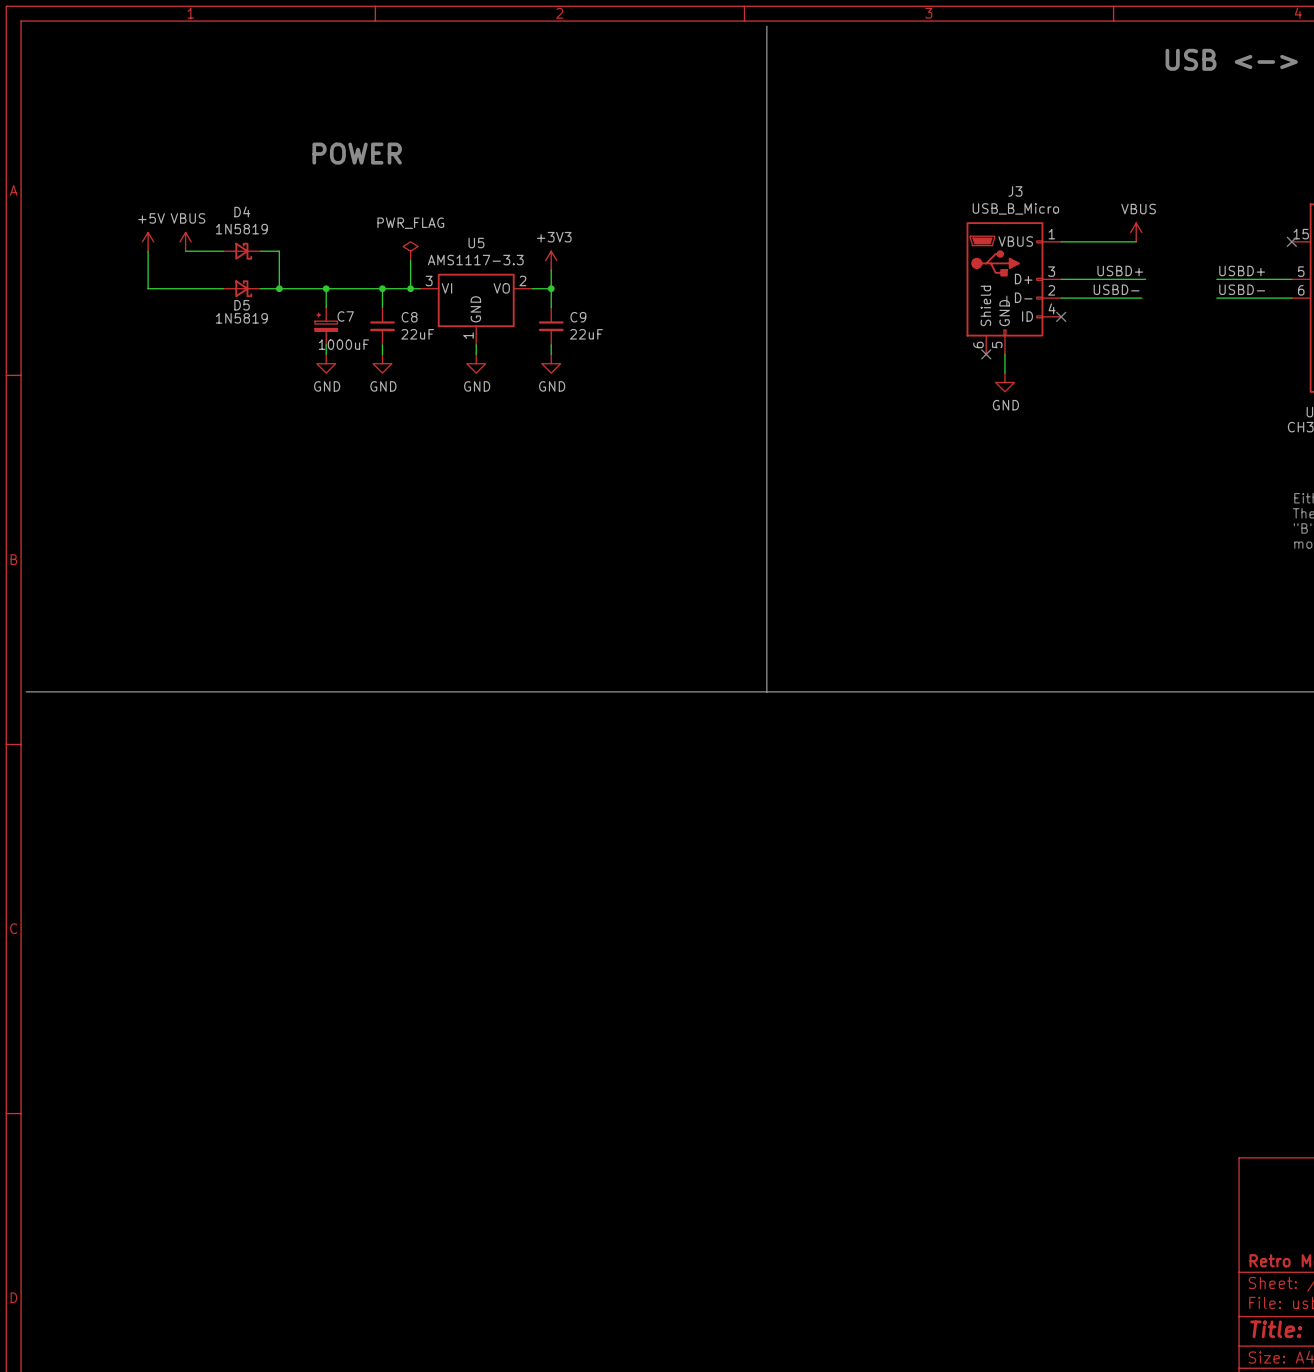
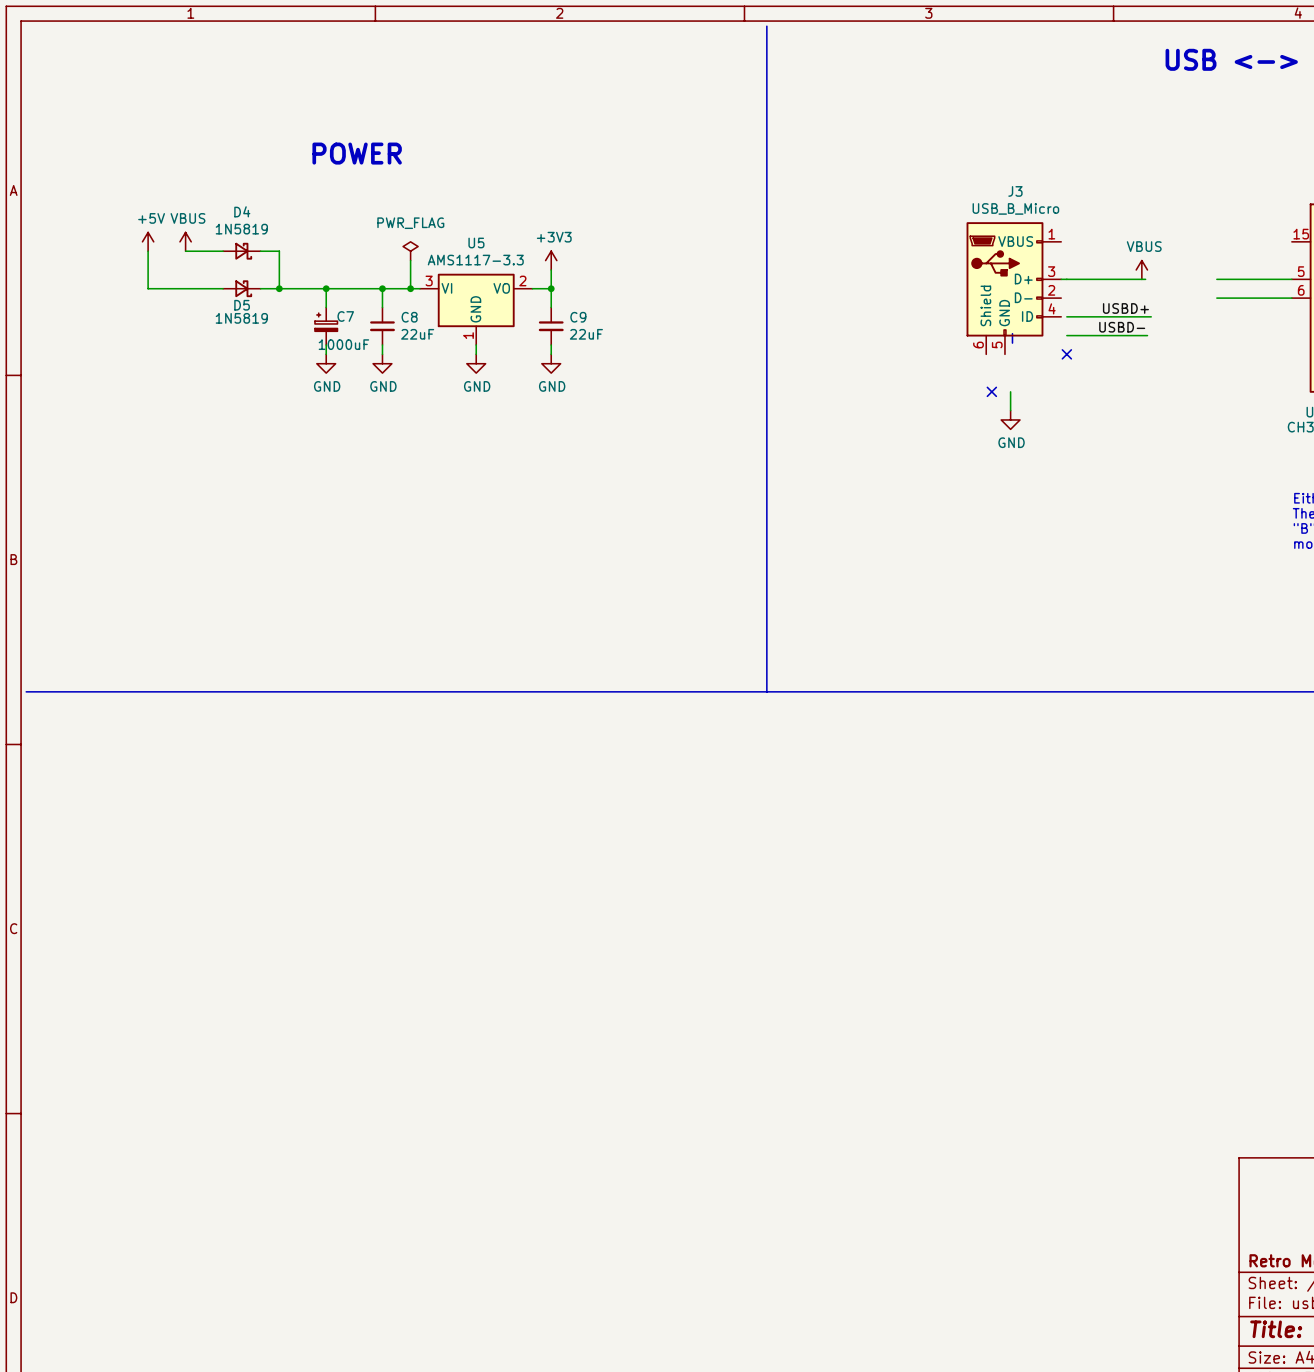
power symbol position: VBUS (1136, 232) -> VBUS (1141, 269)
wire: (1061, 241) (1136, 241) -> none
no-connect mark: (1291, 241) -> none
label: USBD+ (1120, 270) -> none
label: USBD+ (1242, 270) -> none
label position: USBD- (1116, 289) -> USBD- (1122, 327)
label: USBD- (1242, 289) -> none
line: (1006, 296) (1006, 305) -> (1012, 333) (1012, 343)
wire: (1061, 298) (1141, 298) -> (1066, 335) (1147, 335)
label: none -> USBD+ (1125, 308)
no-connect mark position: (1061, 316) -> (1066, 354)
wire: none -> (1066, 316) (1151, 316)
no-connect mark position: (986, 354) -> (991, 391)
wire: (1004, 354) (1004, 373) -> (1010, 391) (1010, 410)
power symbol position: GND (1004, 382) -> GND (1010, 419)

